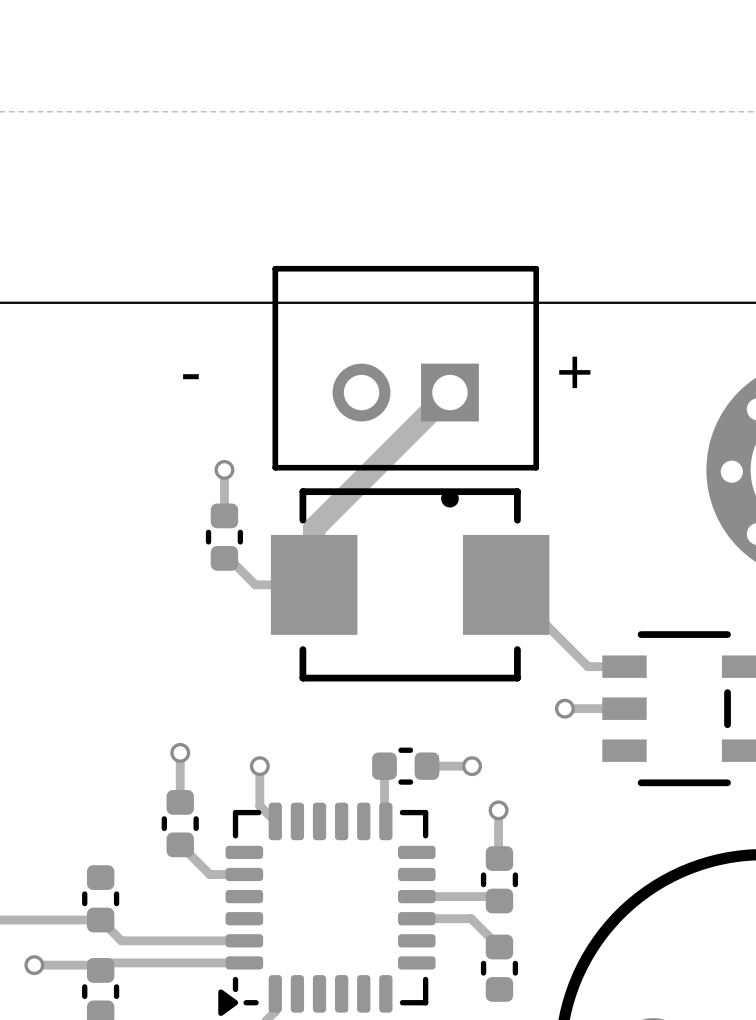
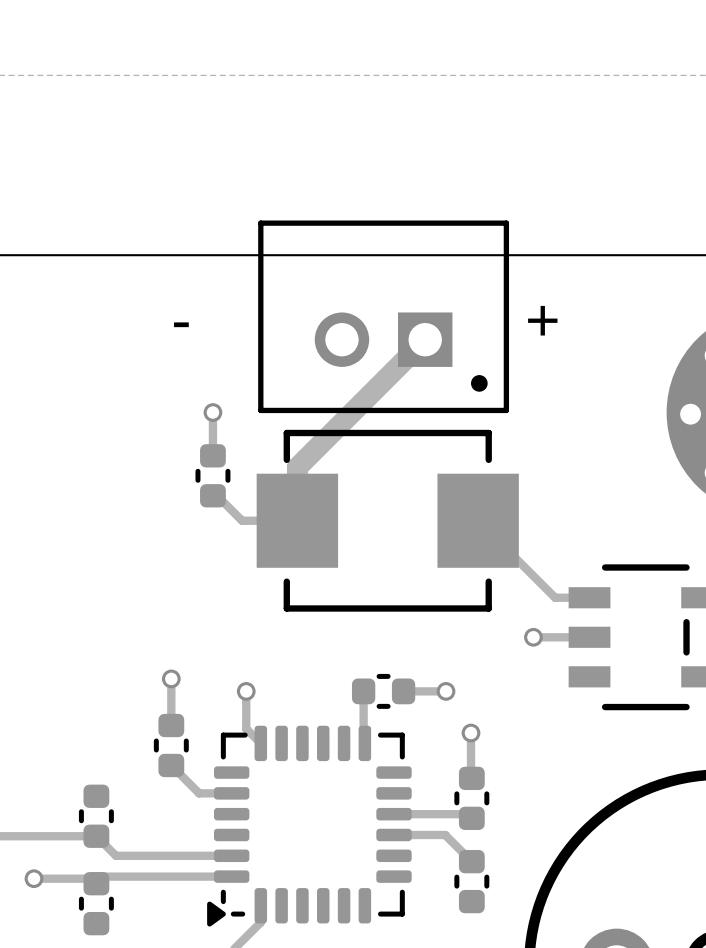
part footprint: [272, 265, 539, 508] -> [258, 220, 510, 414]

